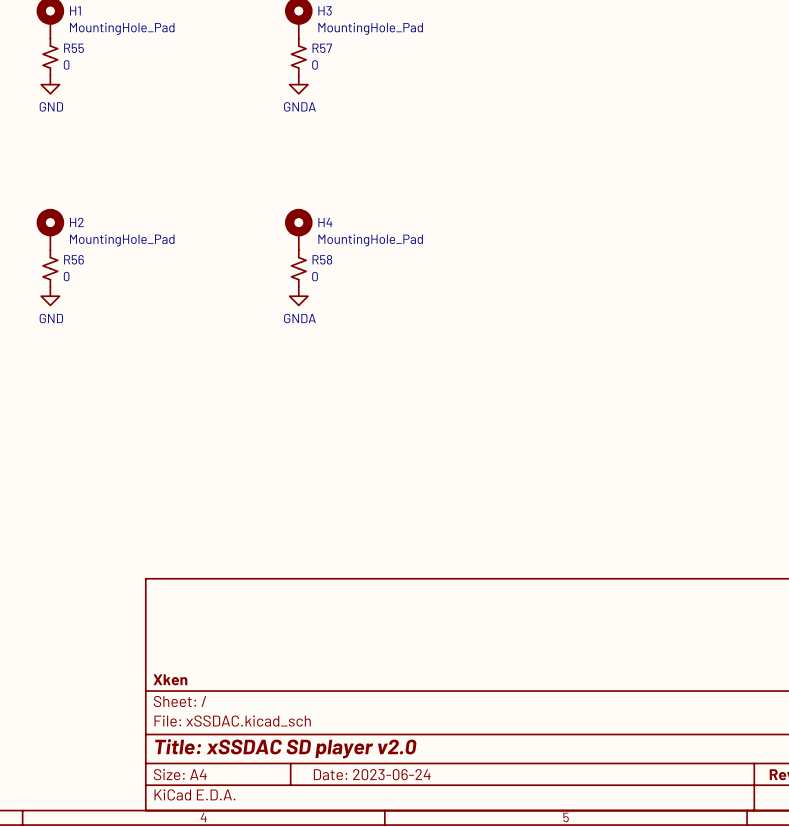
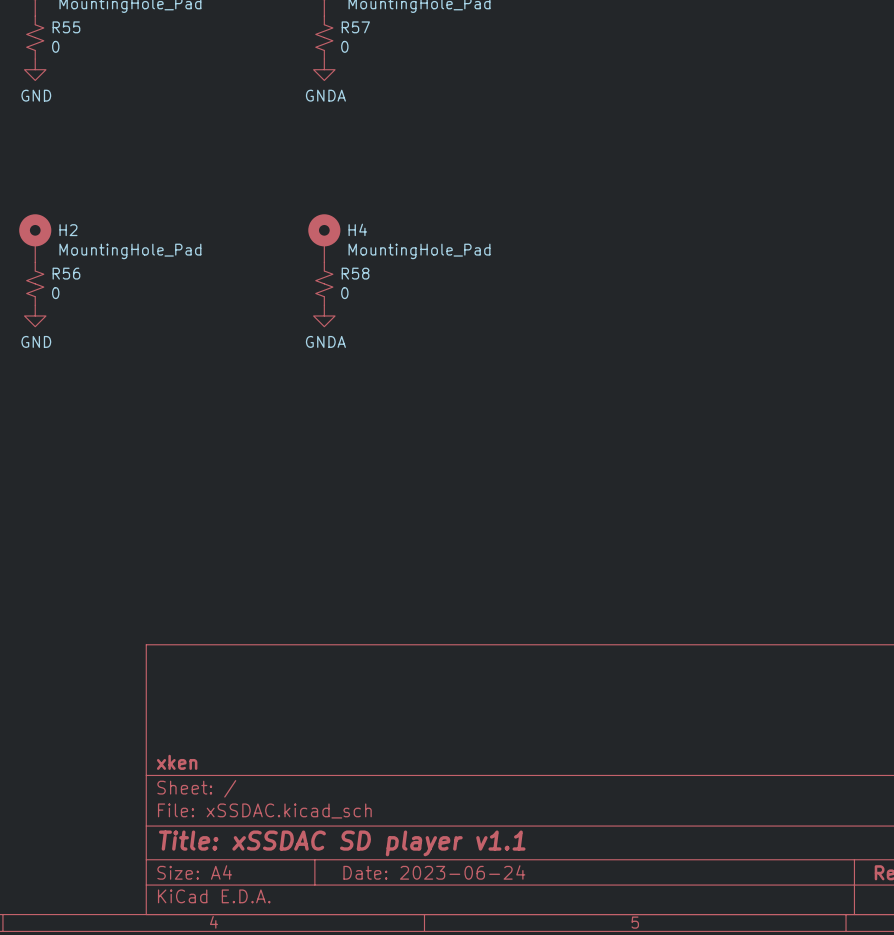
title block: Xken (170, 679) -> xken (177, 762)
title block: Title: xSSDAC SD player v2.0 (285, 748) -> Title: xSSDAC SD player v1.1 (342, 843)

